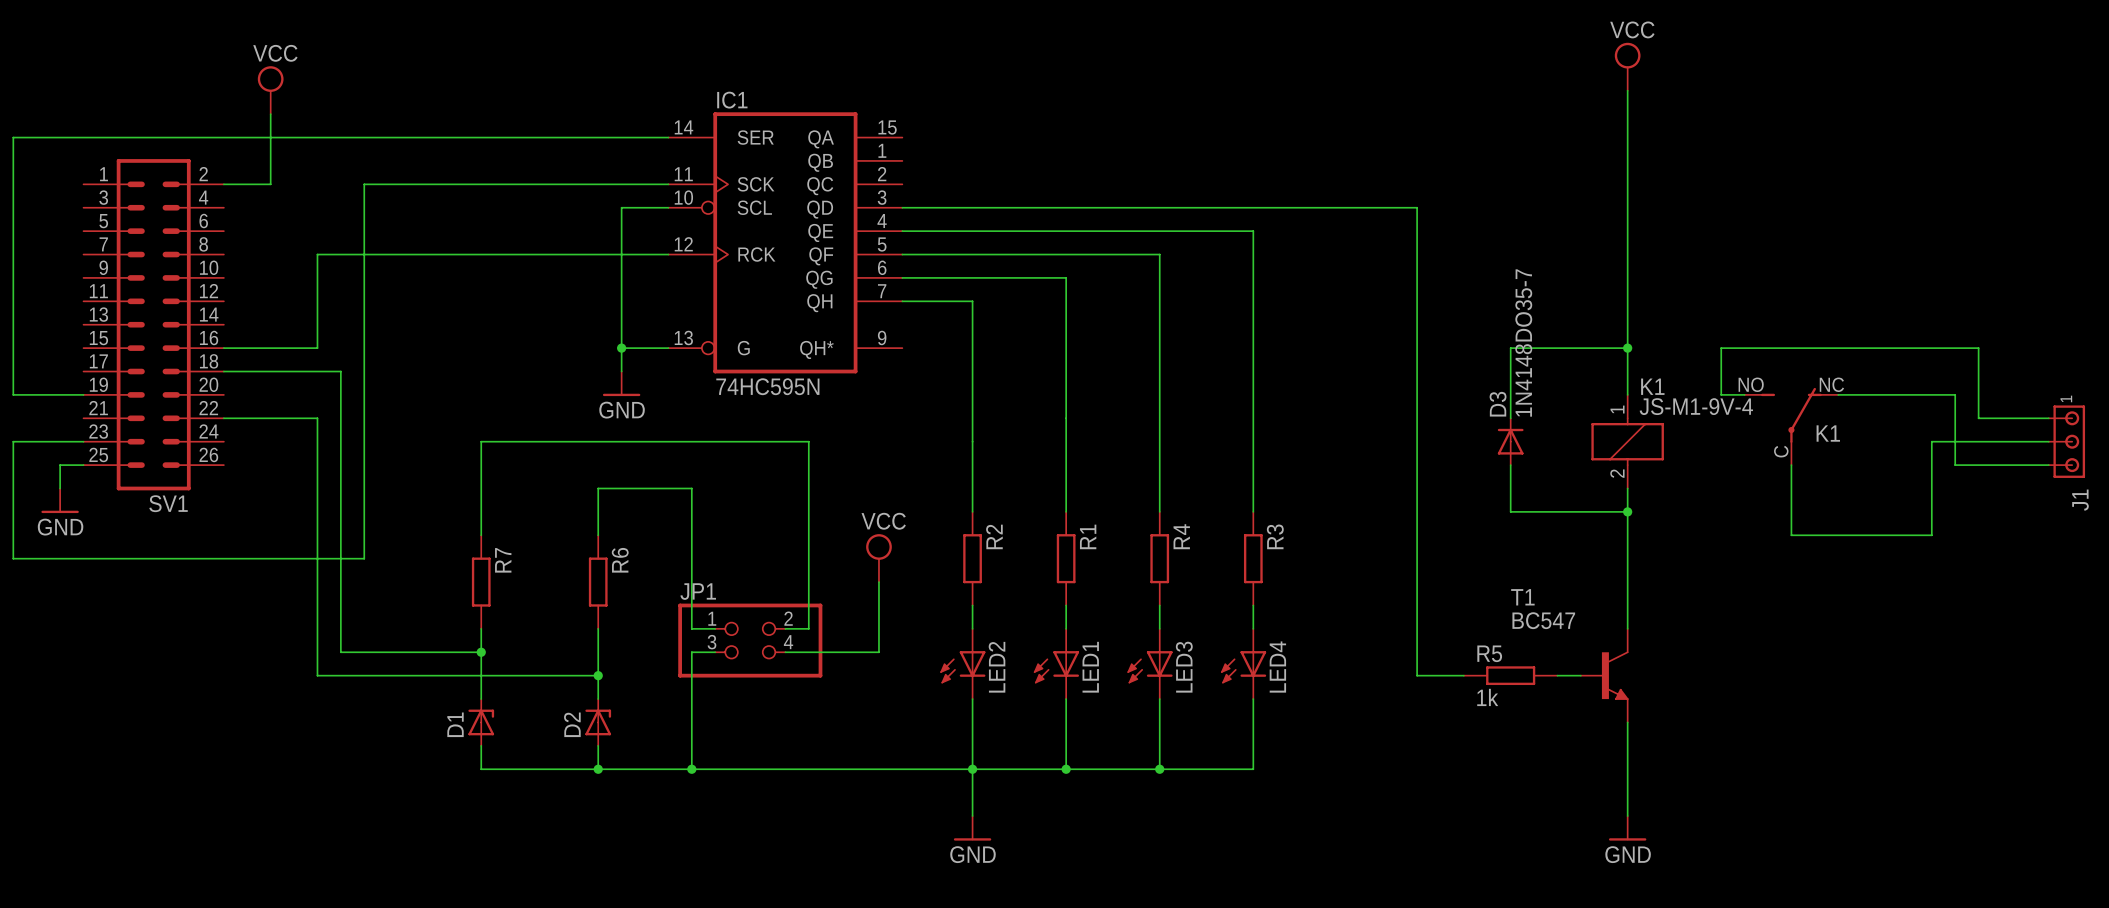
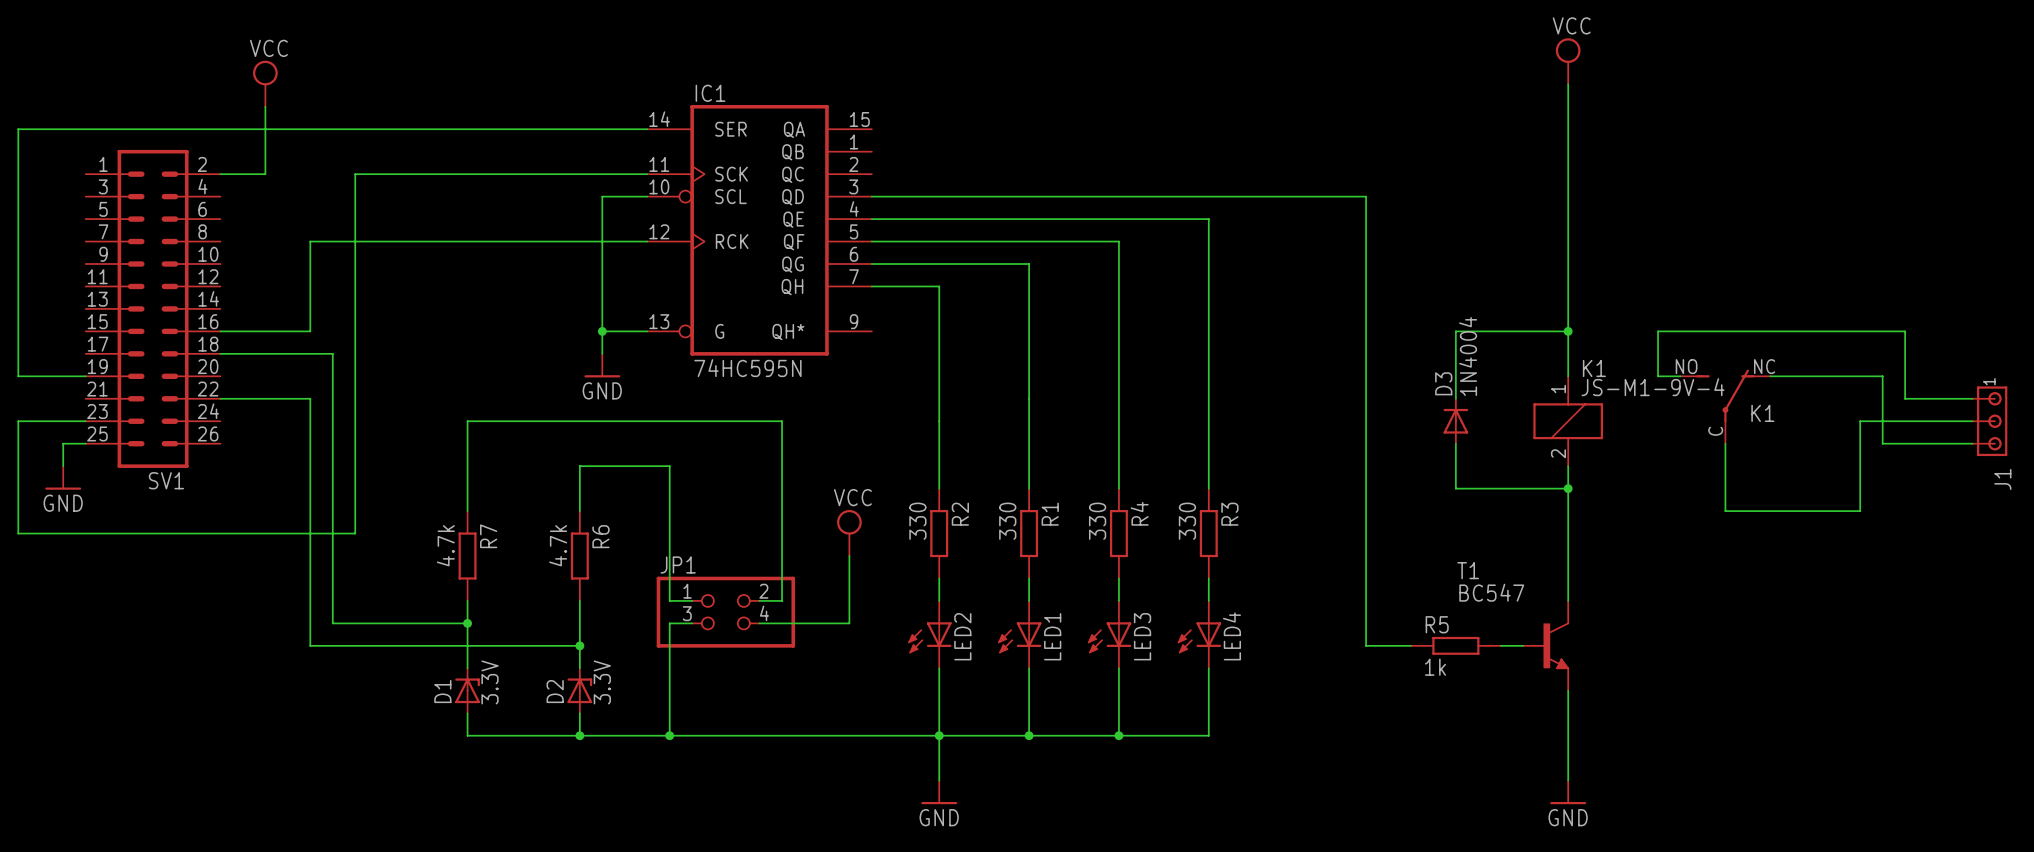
D3 value: 1N4148DO35-7 (1523, 342) -> 1N4004 (1468, 356)
R2 value: none -> 330 (917, 521)
R1 value: none -> 330 (1007, 521)
R4 value: none -> 330 (1097, 521)
R3 value: none -> 330 (1187, 521)
R7 value: none -> 4.7k (445, 545)
R6 value: none -> 4.7k (558, 545)
D1 value: none -> 3.3V (490, 682)
D2 value: none -> 3.3V (602, 682)

